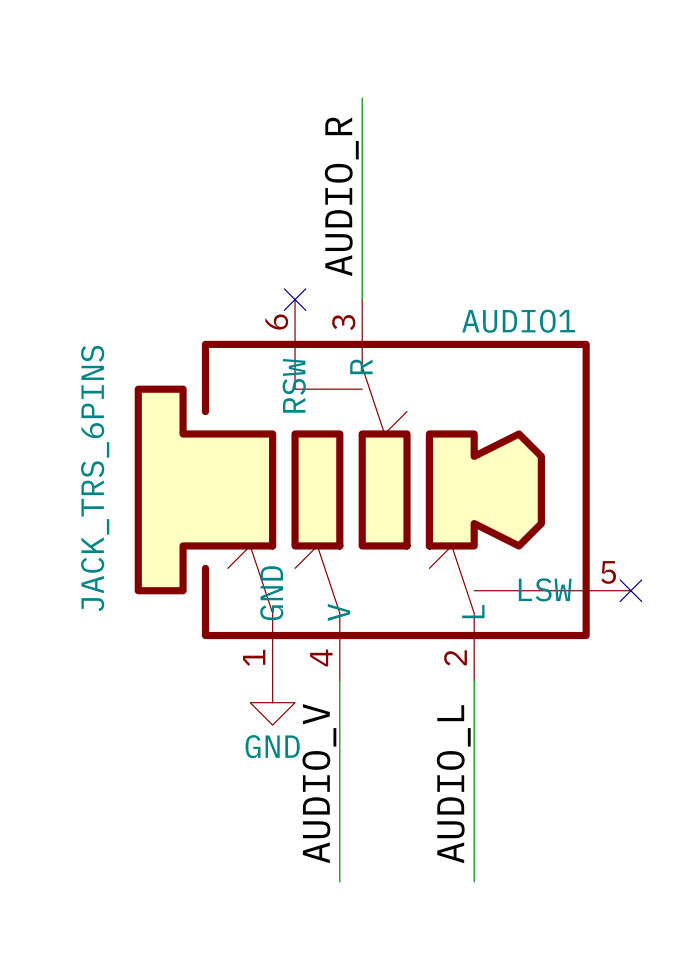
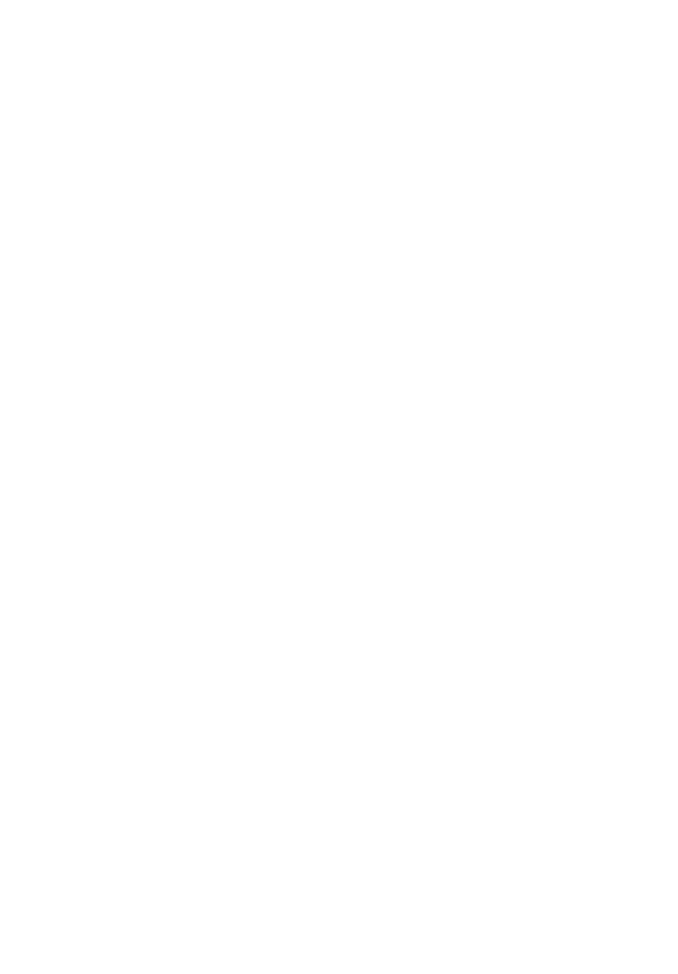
wire: (362, 98) (362, 299) -> none
label: AUDIO_R (341, 196) -> none
no-connect mark: (295, 299) -> none
AUDIO1: JACK_TRS_6PINS (382, 489) -> none
no-connect mark: (630, 590) -> none
wire: (339, 680) (339, 881) -> none
wire: (474, 680) (474, 881) -> none
power symbol: GND (272, 702) -> none
label: AUDIO_V (319, 783) -> none
label: AUDIO_L (453, 784) -> none

